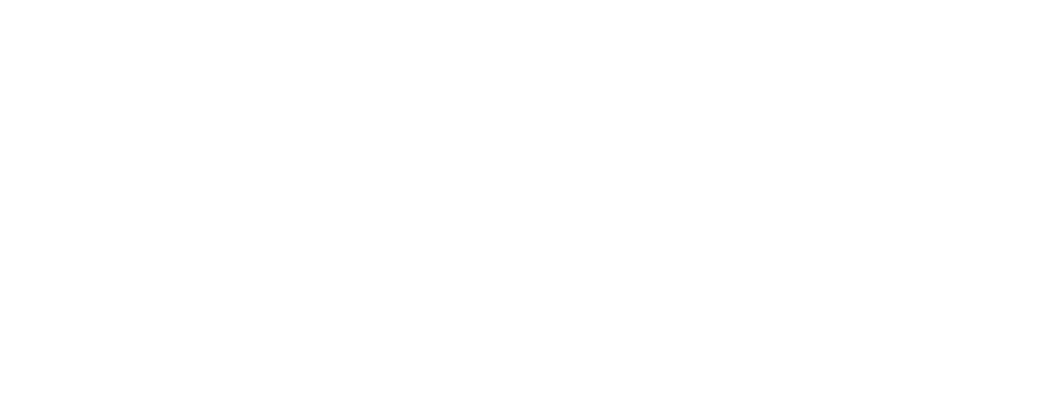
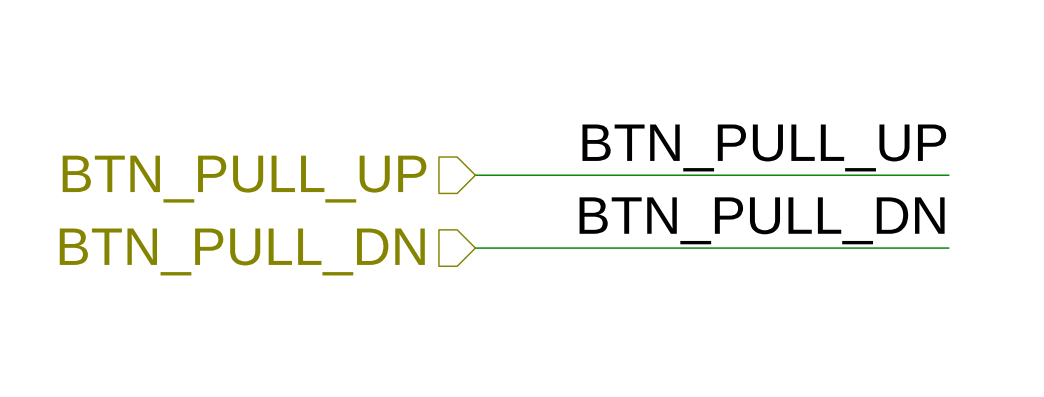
label: none -> BTN_PULL_UP (764, 147)
hierarchical label: none -> BTN_PULL_UP (244, 179)
wire: none -> (475, 175) (948, 175)
label: none -> BTN_PULL_DN (762, 220)
hierarchical label: none -> BTN_PULL_DN (242, 251)
wire: none -> (475, 248) (948, 248)

